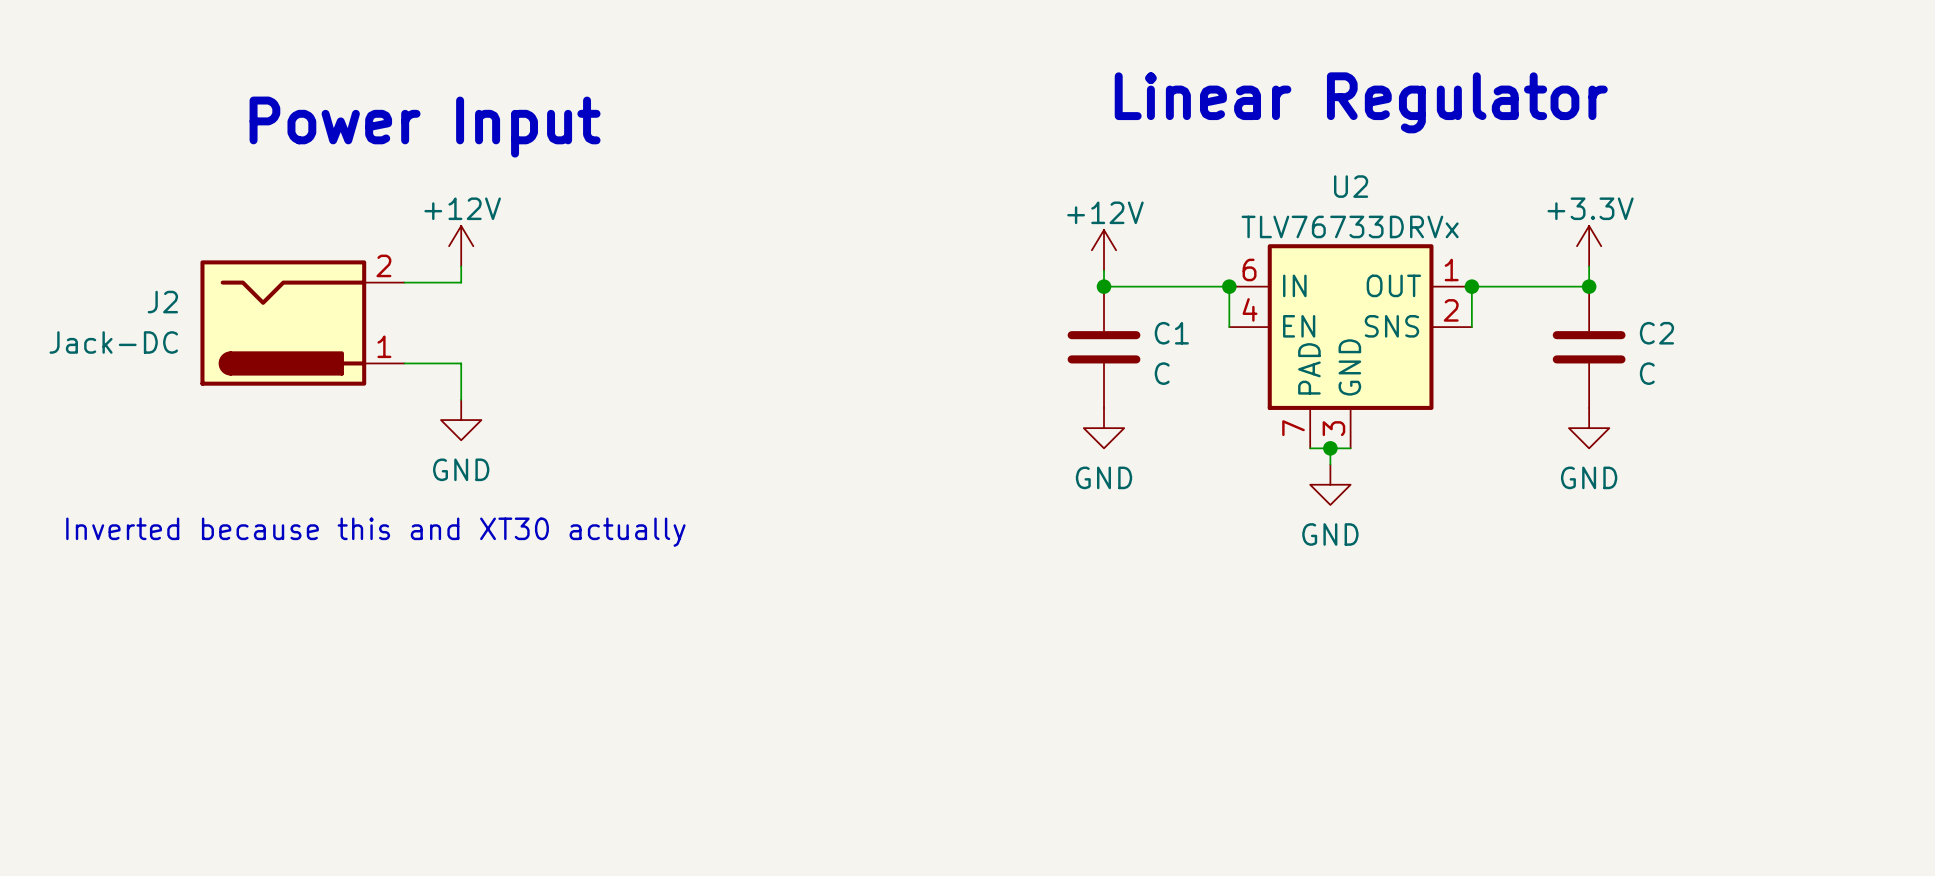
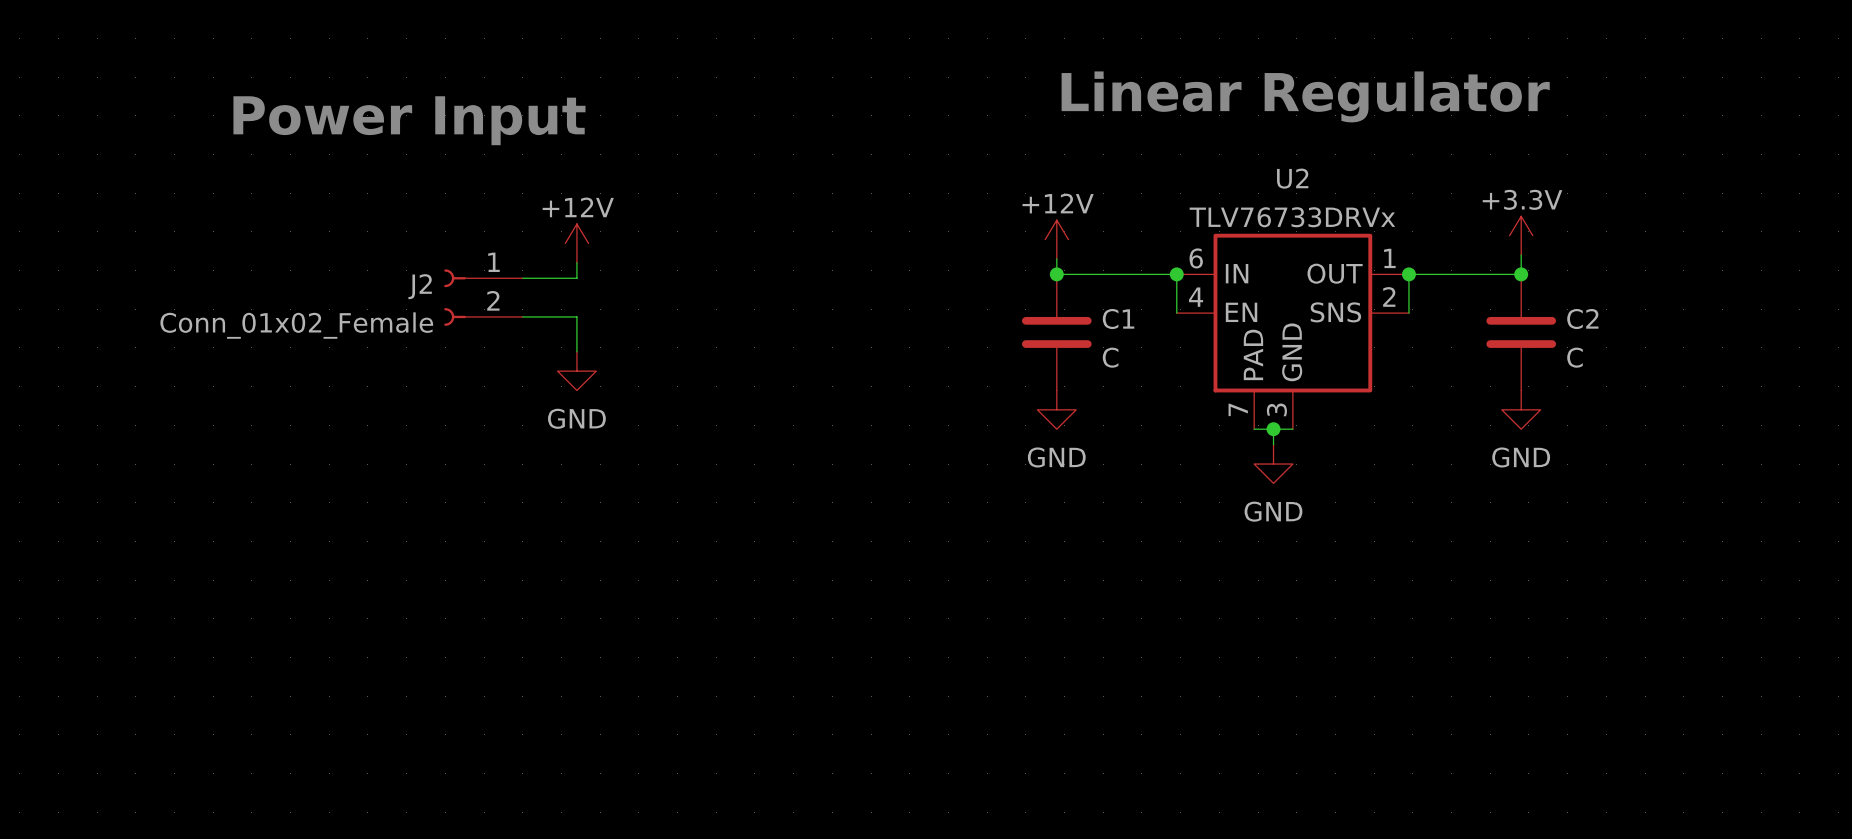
power symbol position: +12V (461, 246) -> +12V (576, 243)
J2 symbol: [200, 260, 405, 386] -> [444, 269, 523, 326]
wire: (461, 266) (461, 282) (404, 282) -> (576, 262) (576, 278) (522, 278)
J2 name position: J2 (162, 302) -> J2 (420, 286)
J2 value: Jack-DC (113, 342) -> Conn_01x02_Female (296, 325)
wire: (404, 363) (461, 363) (461, 399) -> (522, 316) (576, 316) (576, 351)
power symbol position: GND (461, 420) -> GND (576, 371)
text: Inverted because this and XT30 actually (375, 532) -> none

